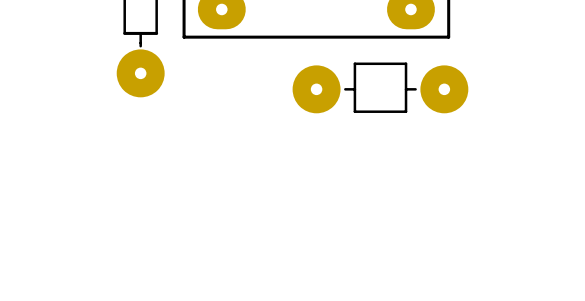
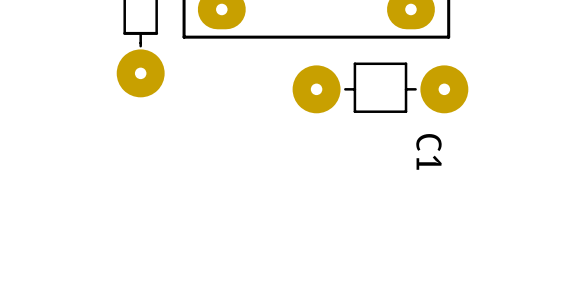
C1 name: none -> C1 (428, 151)

